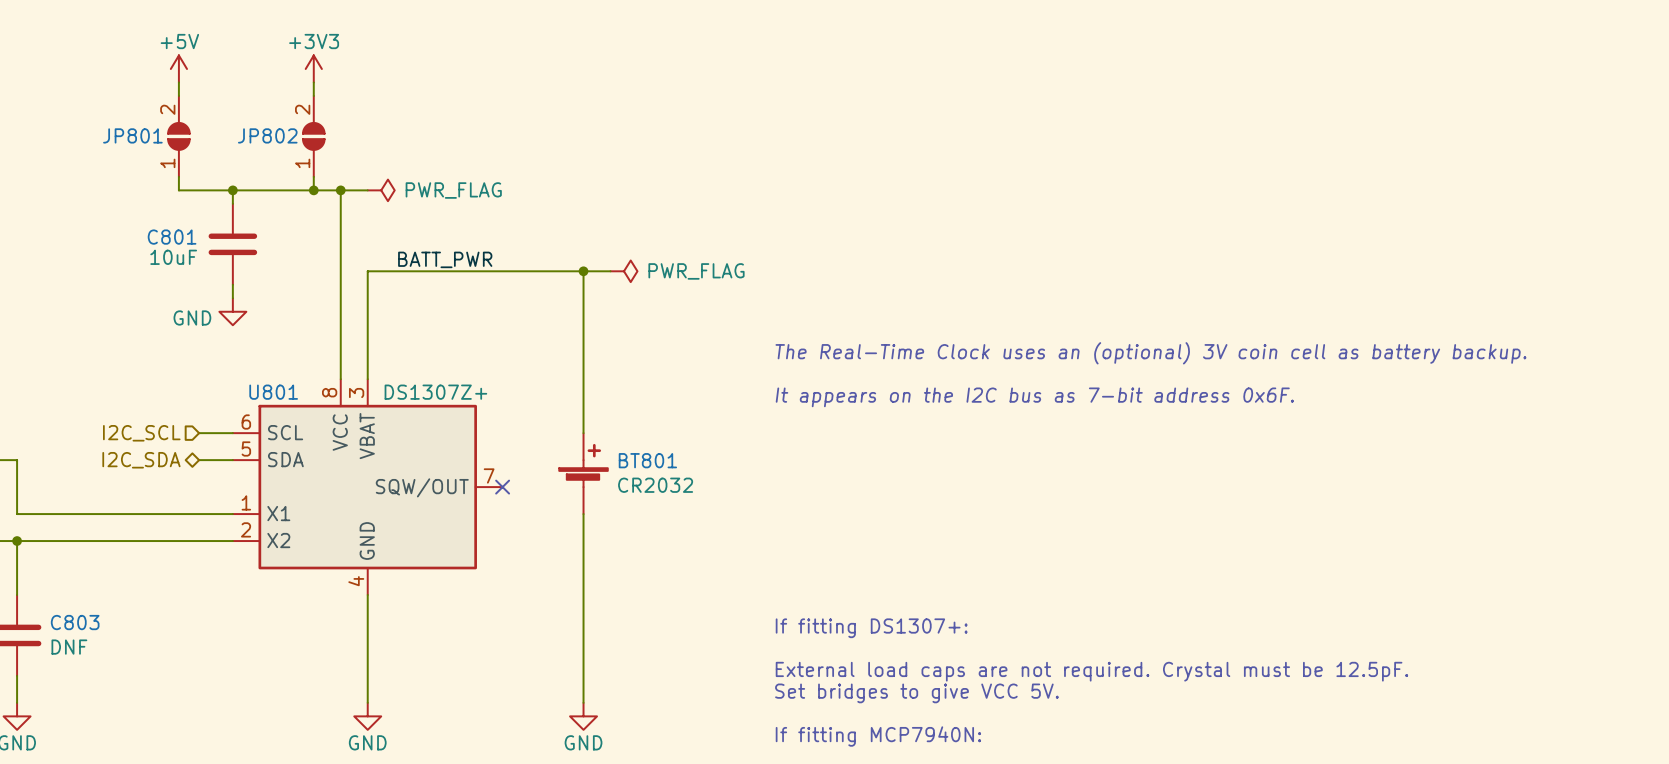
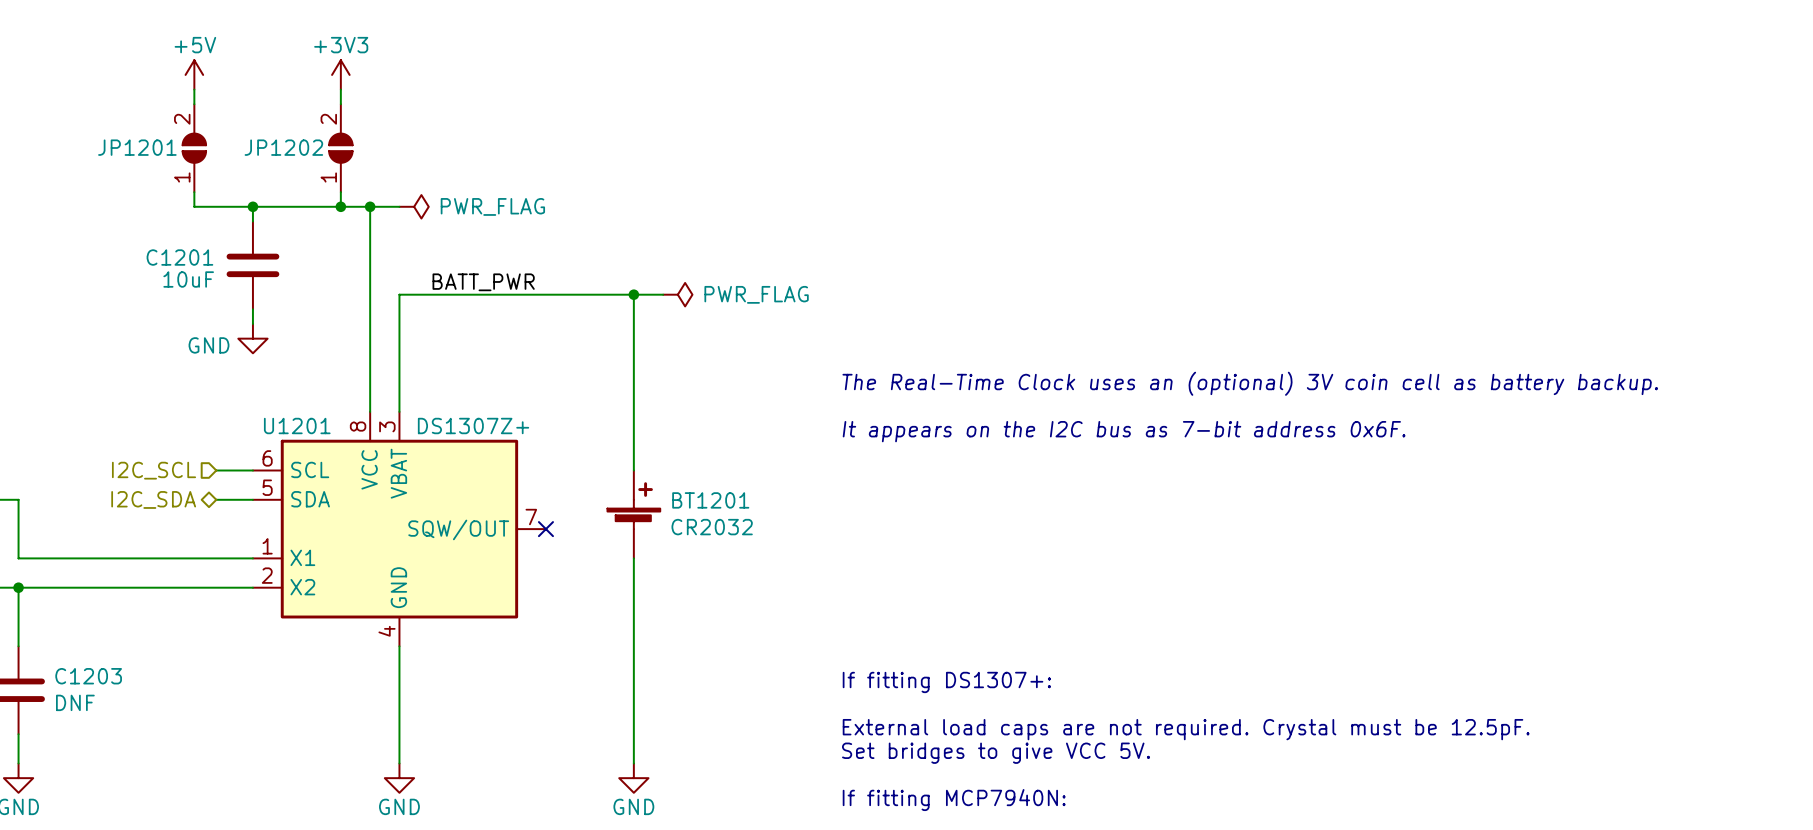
JP801 name: JP801 (132, 135) -> JP1201 (137, 147)
JP802 name: JP802 (267, 135) -> JP1202 (283, 147)
C801 name: C801 (172, 237) -> C1201 (179, 257)
U801 name: U801 (273, 392) -> U1201 (297, 426)
BT801 name: BT801 (647, 460) -> BT1201 (710, 500)
C803 name: C803 (75, 622) -> C1203 (88, 676)

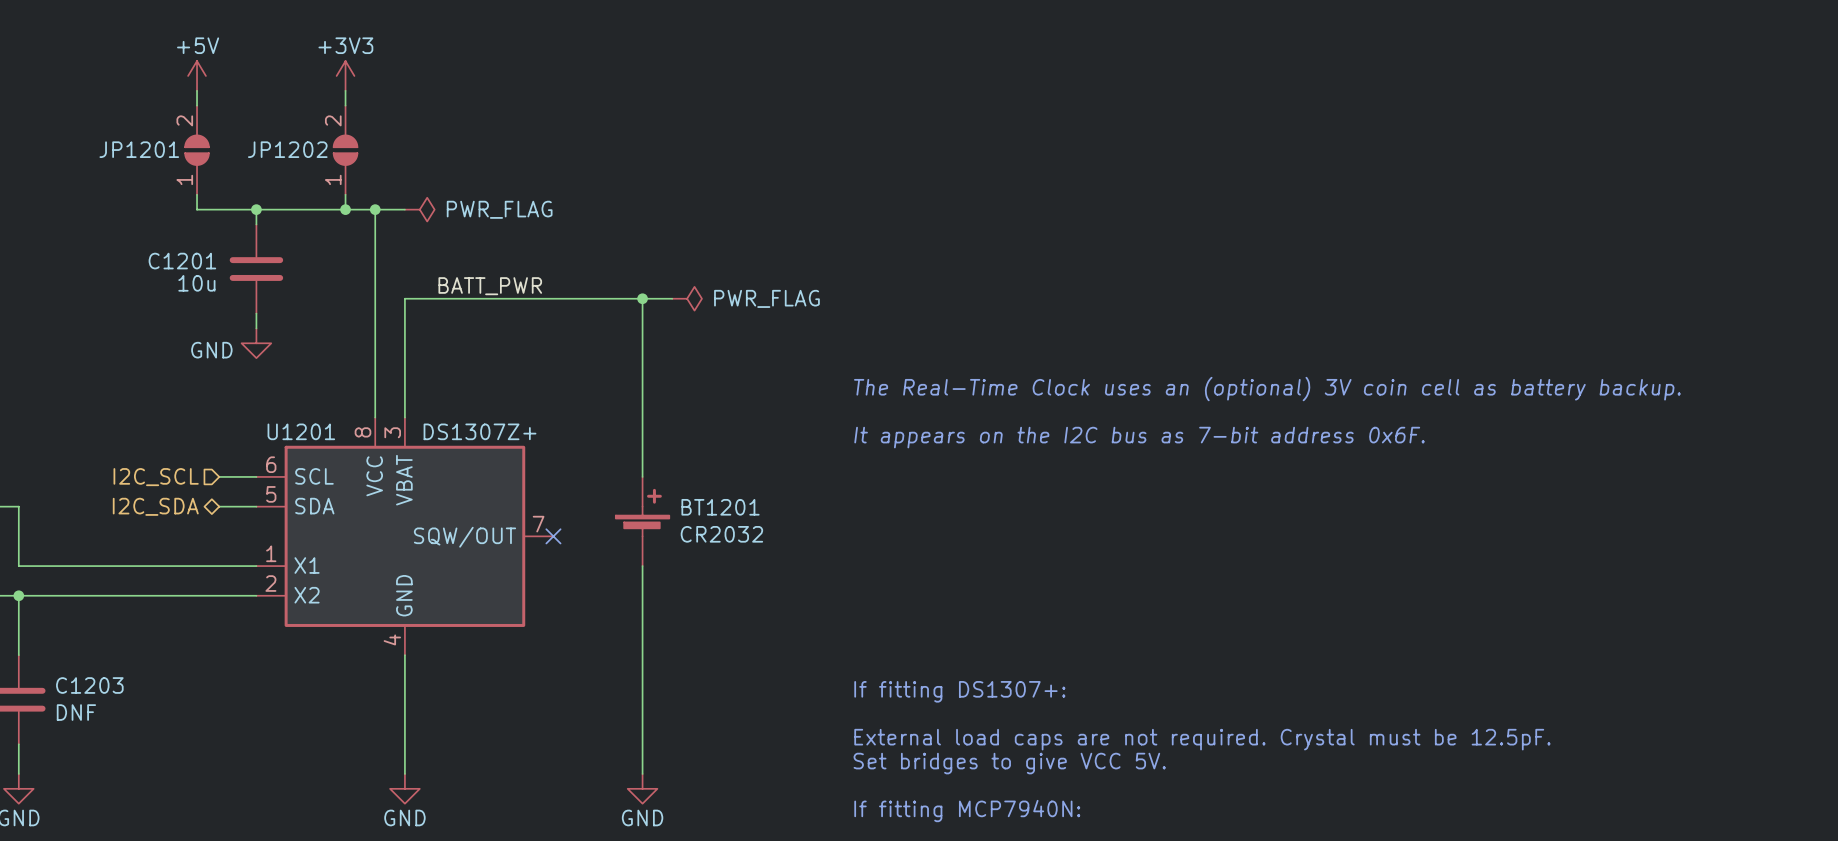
C1201 value: 10uF (188, 279) -> 10u (196, 283)

